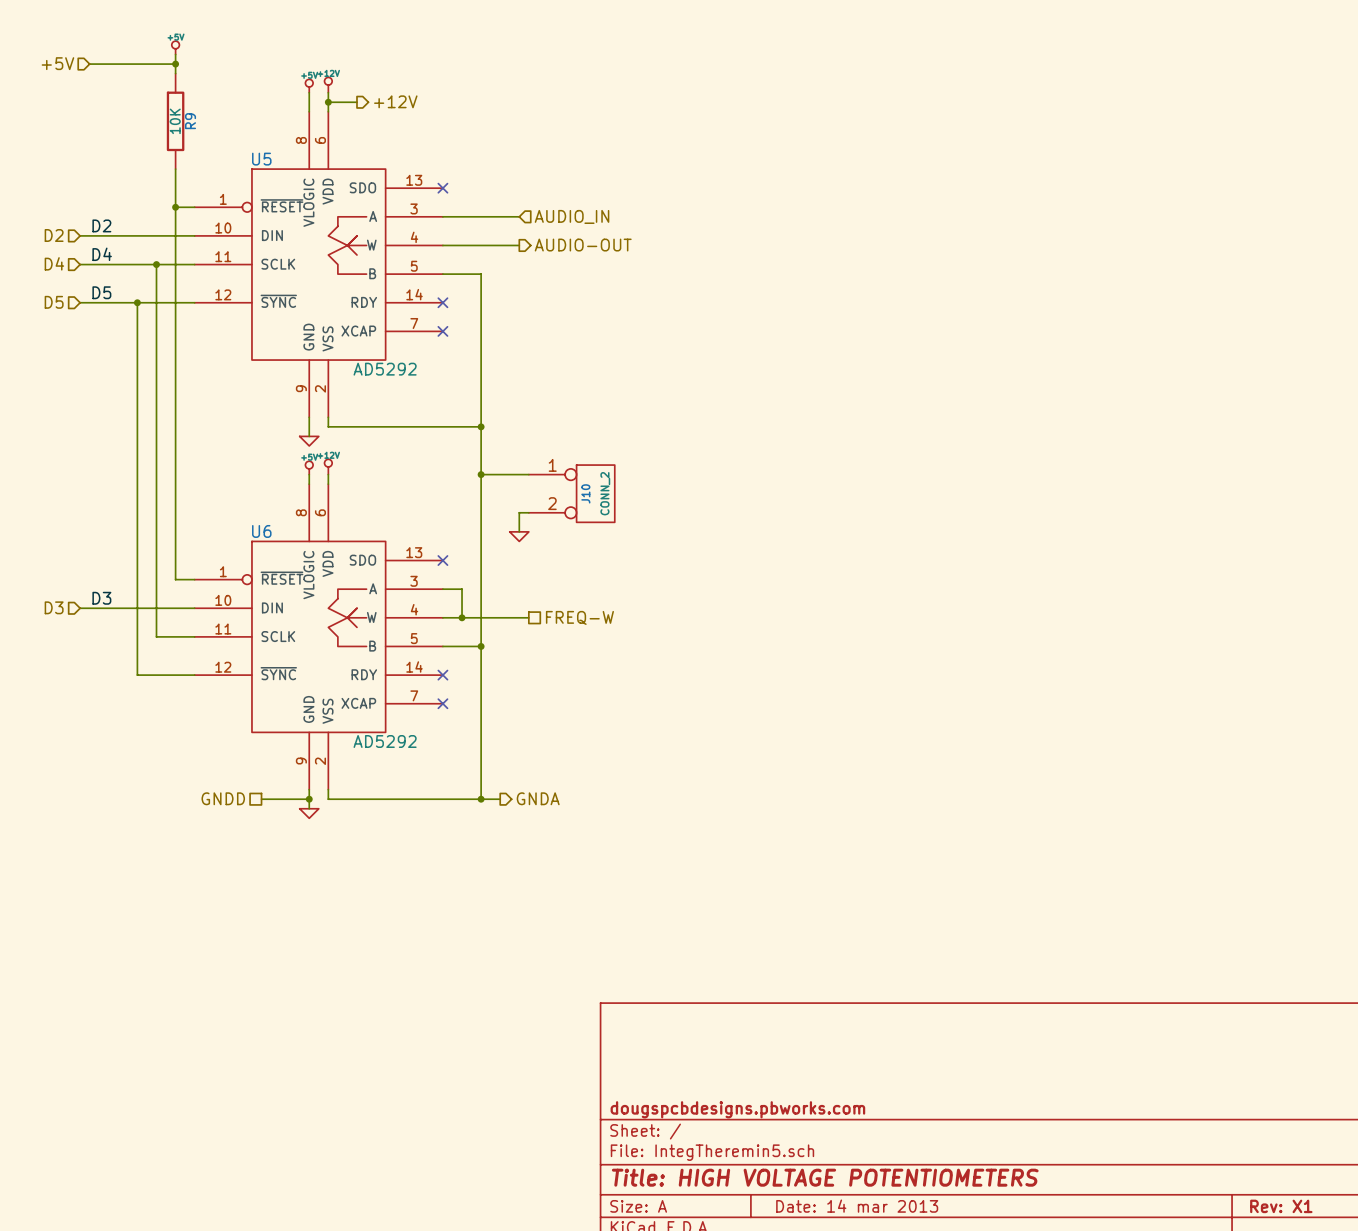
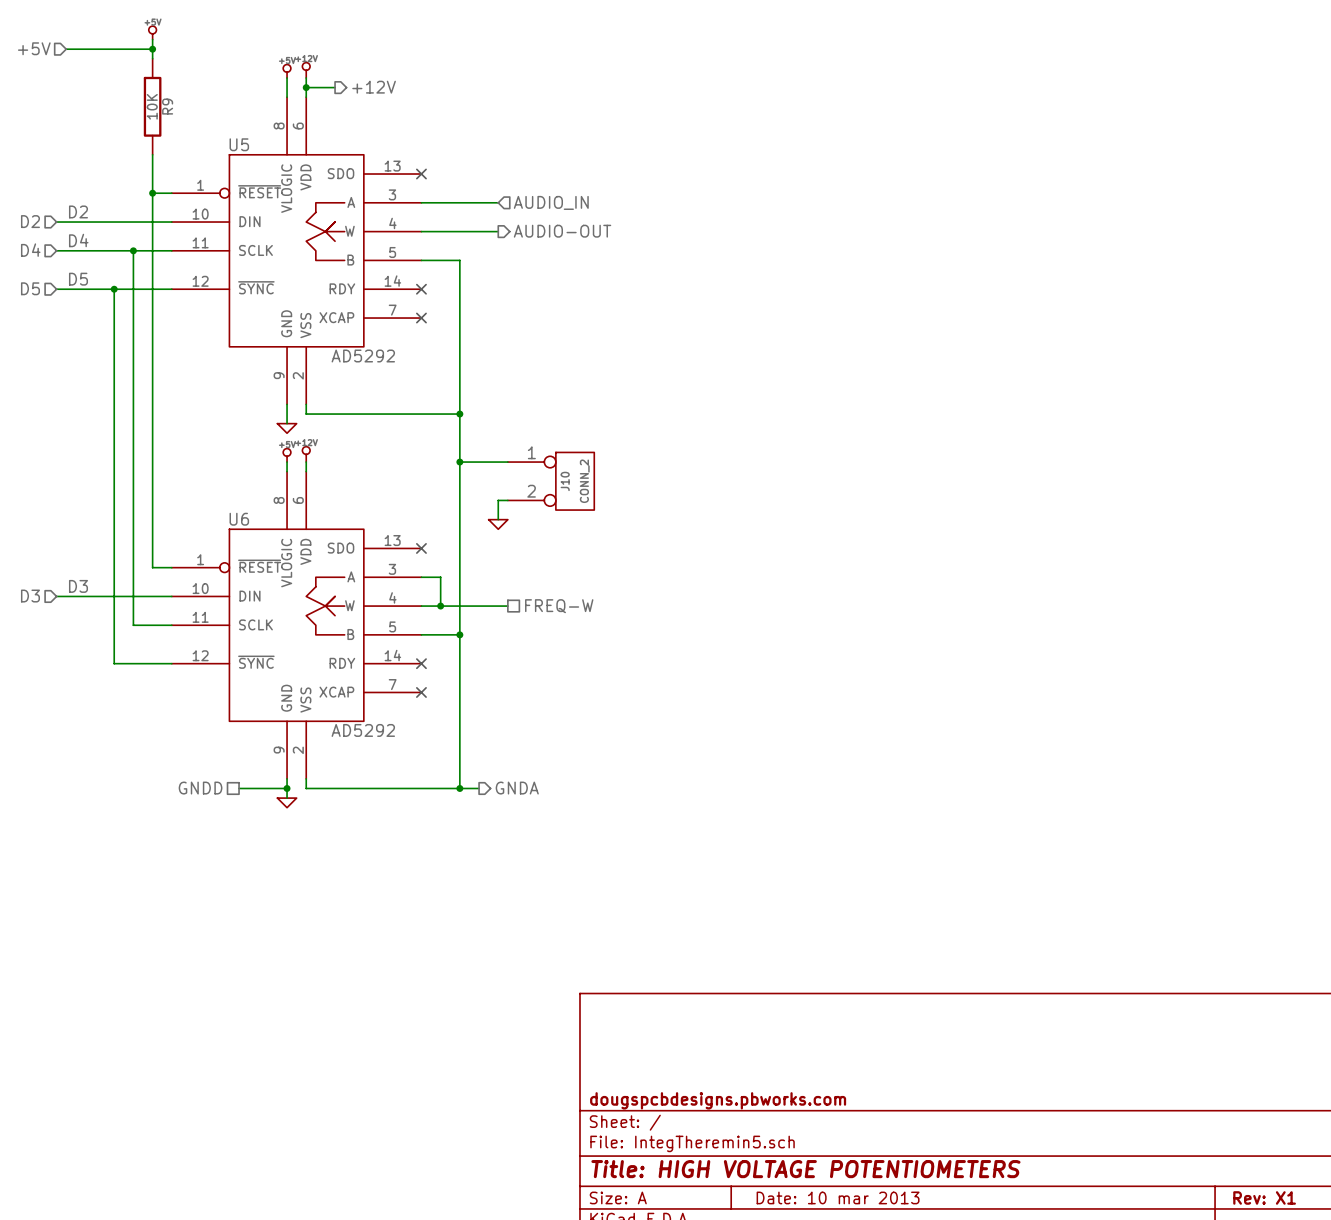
title block: Date: 14 mar 2013 (857, 1206) -> Date: 10 mar 2013 (838, 1197)

